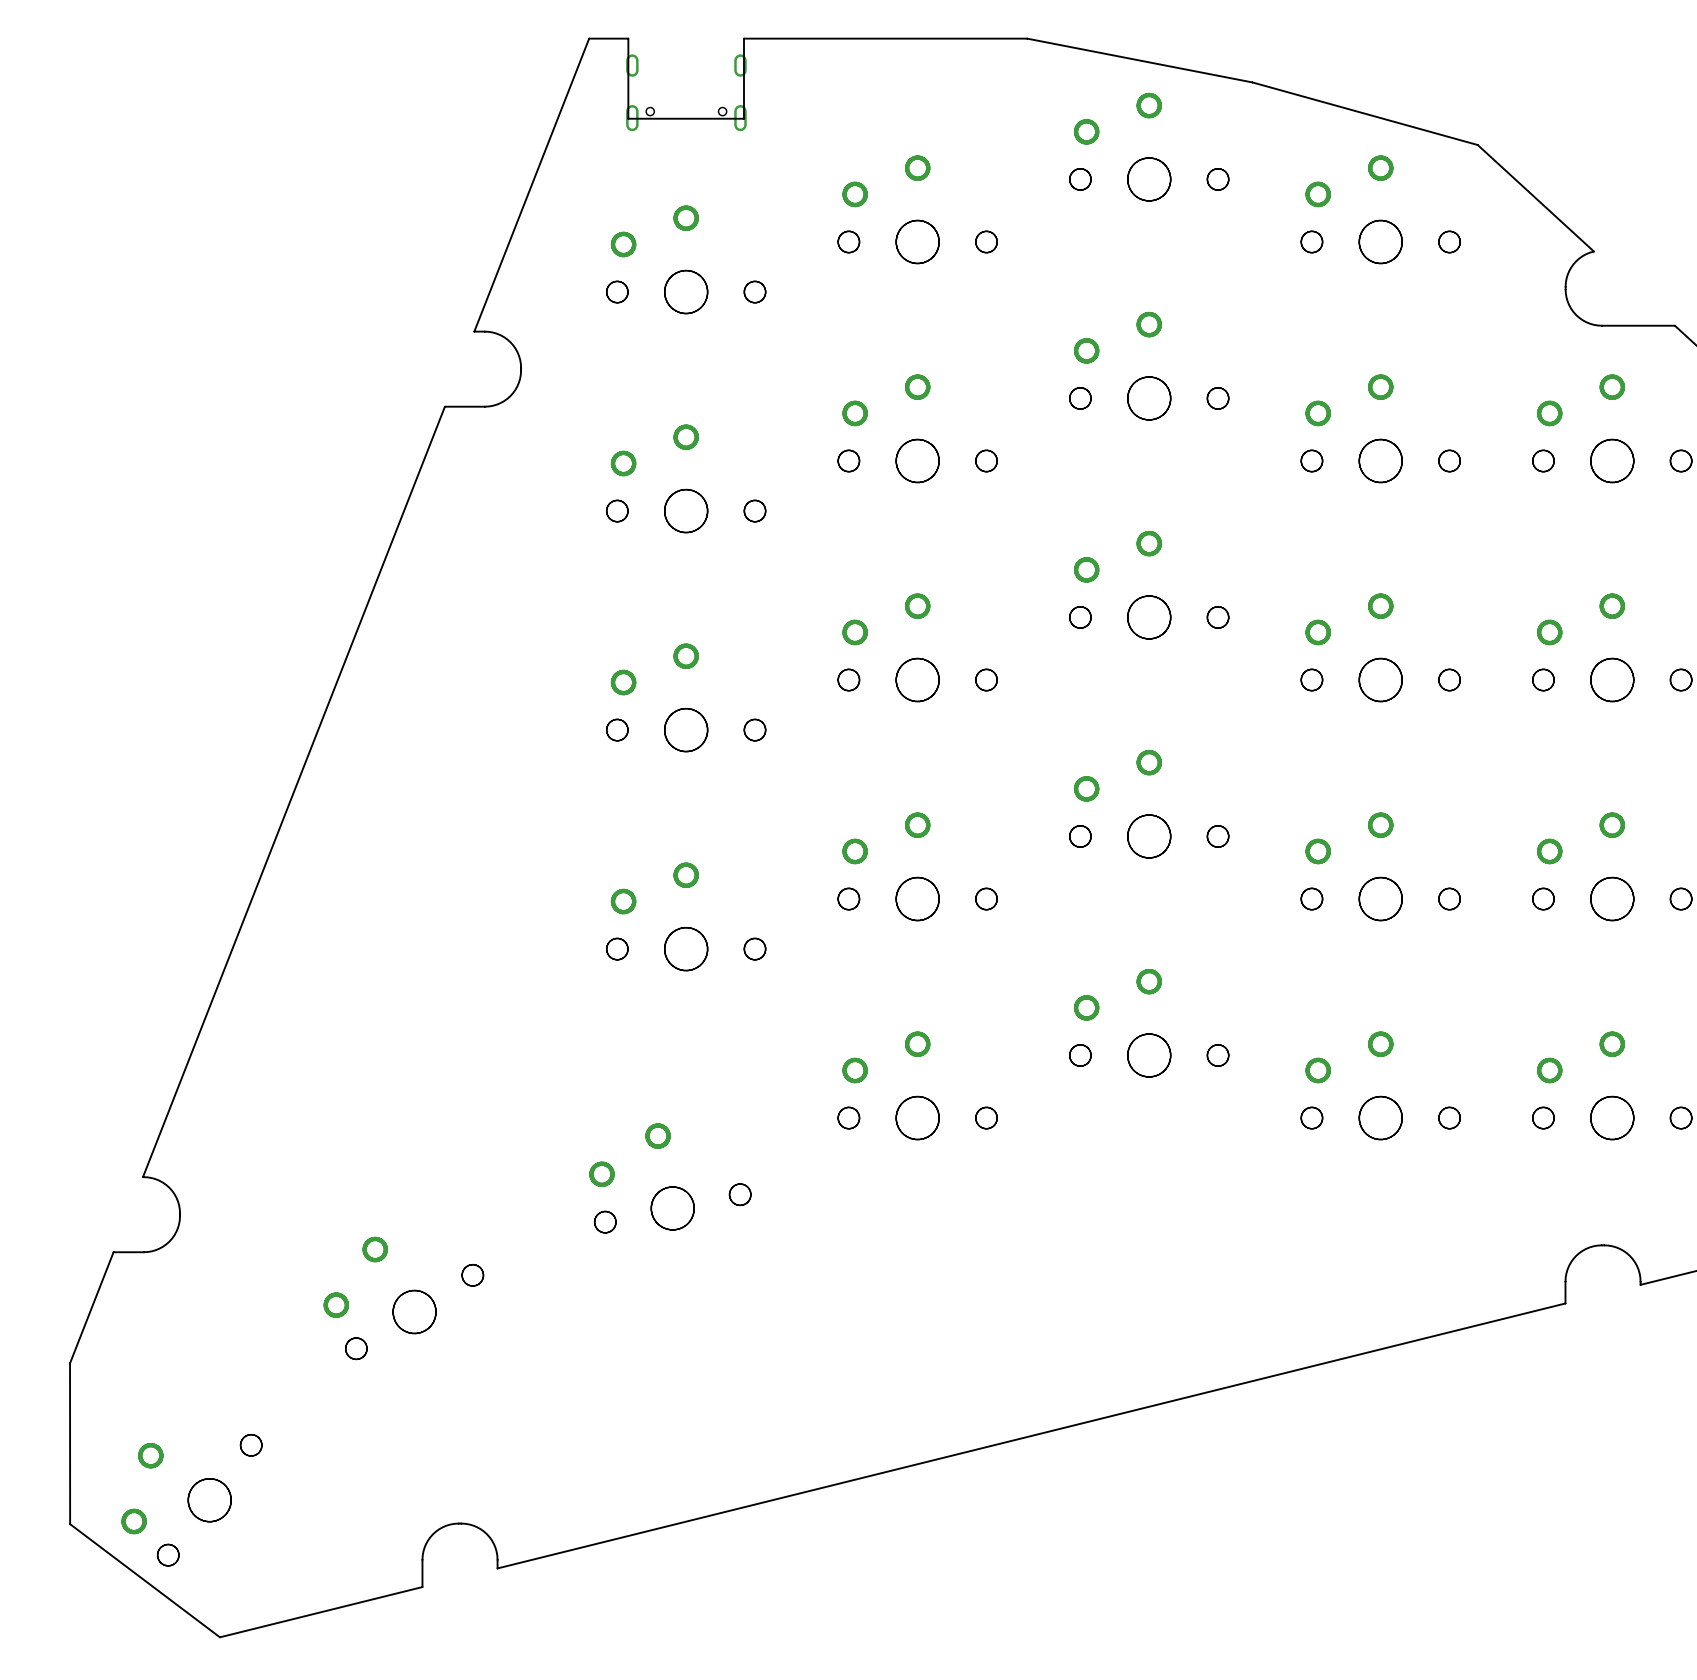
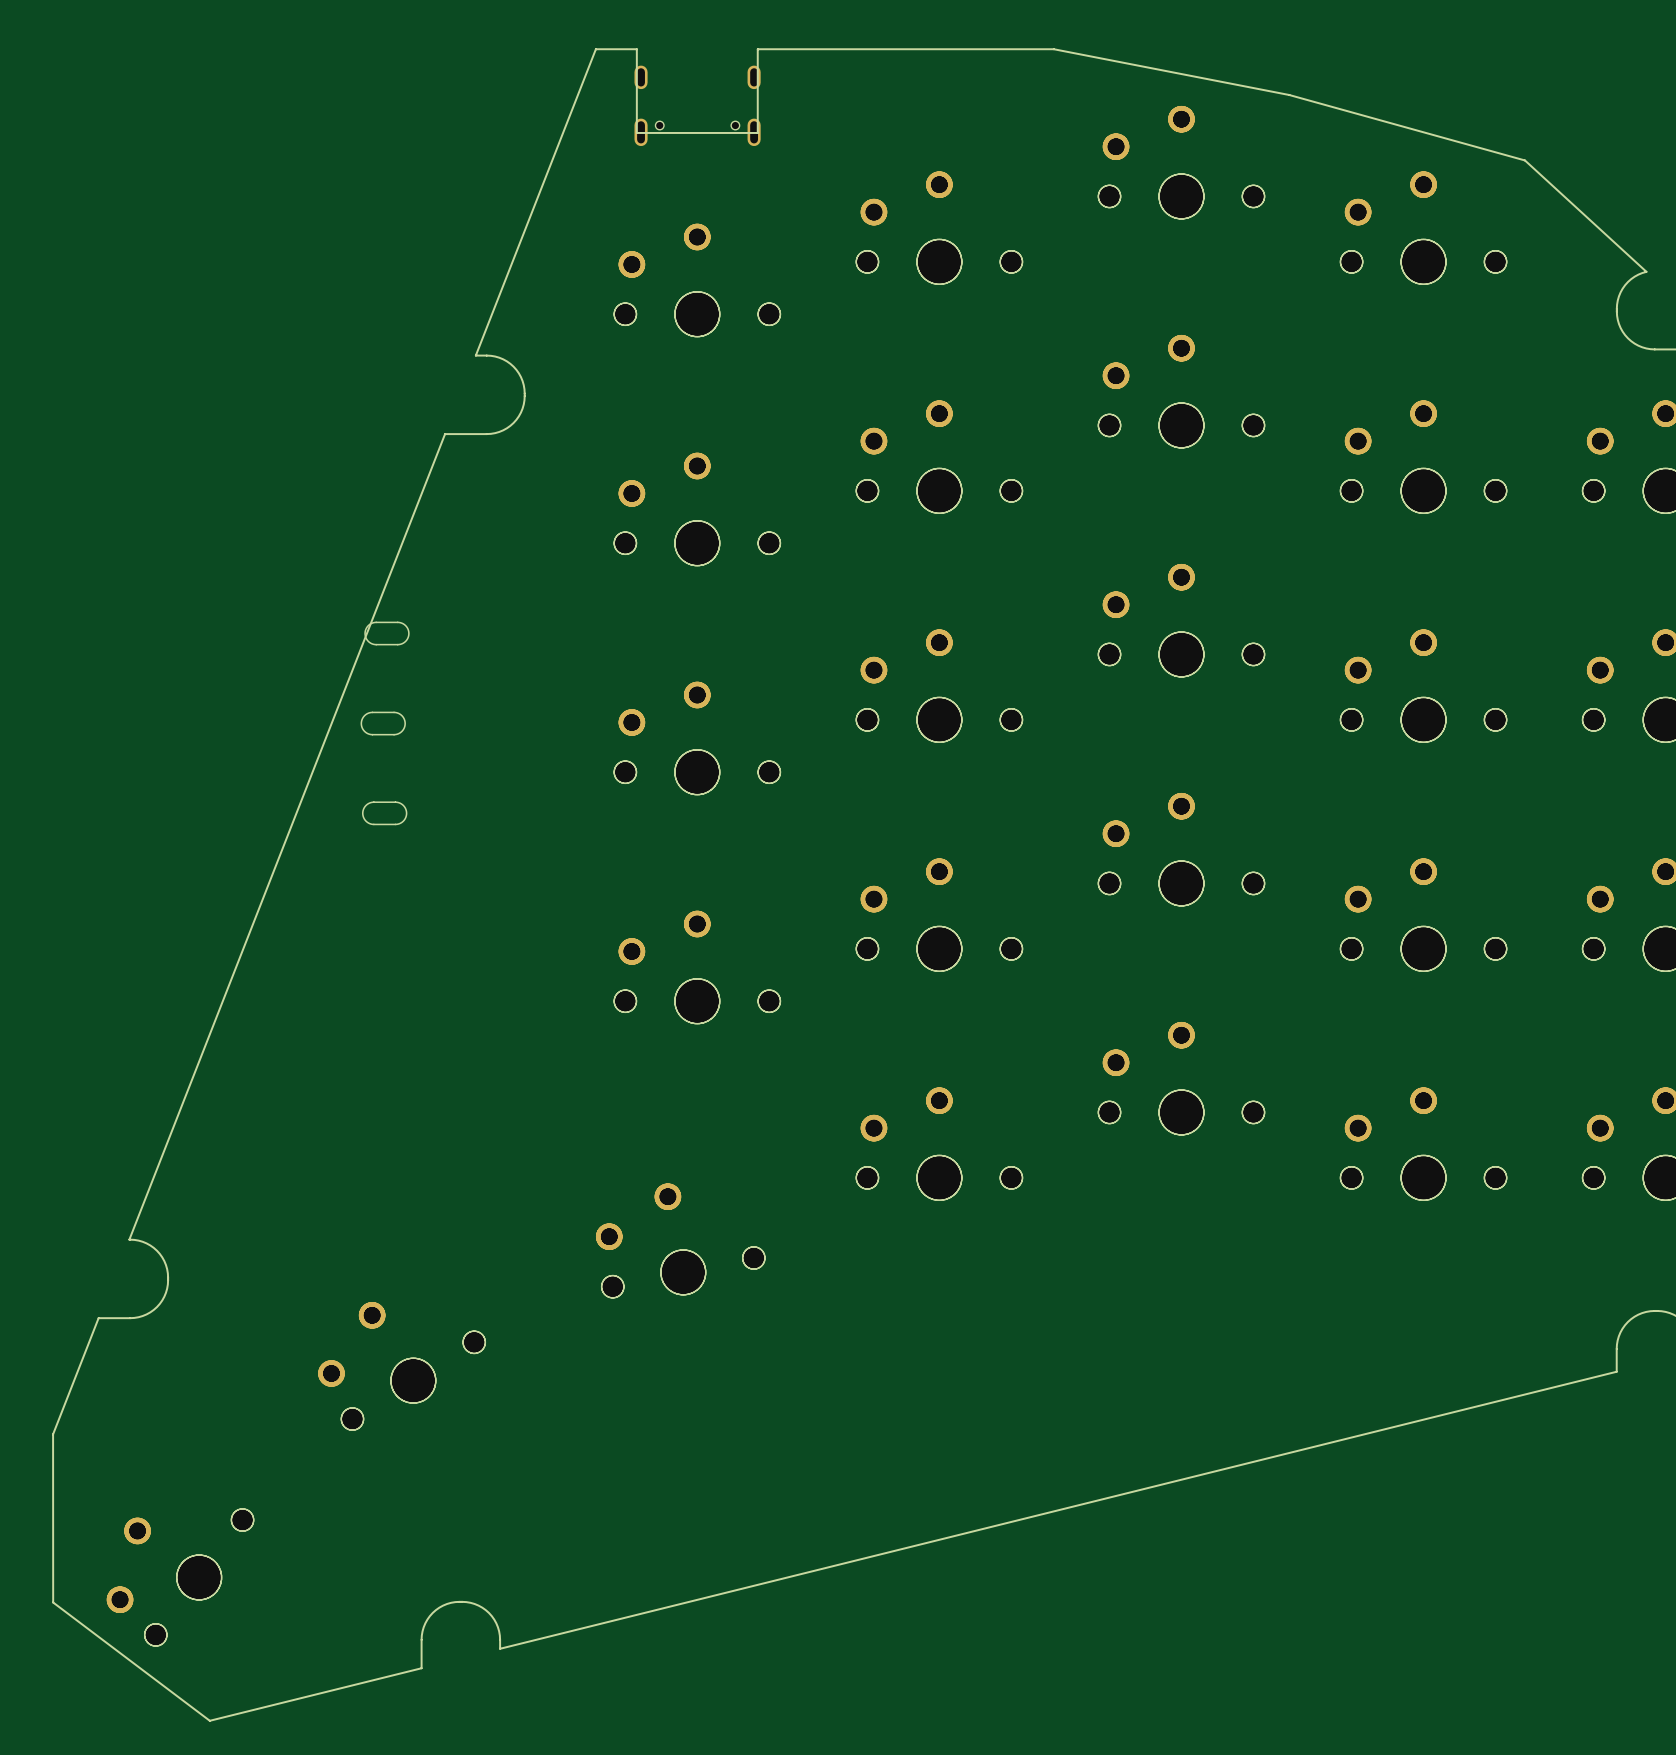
part: none -> (386, 633)
part: none -> (383, 723)
part: none -> (384, 813)

